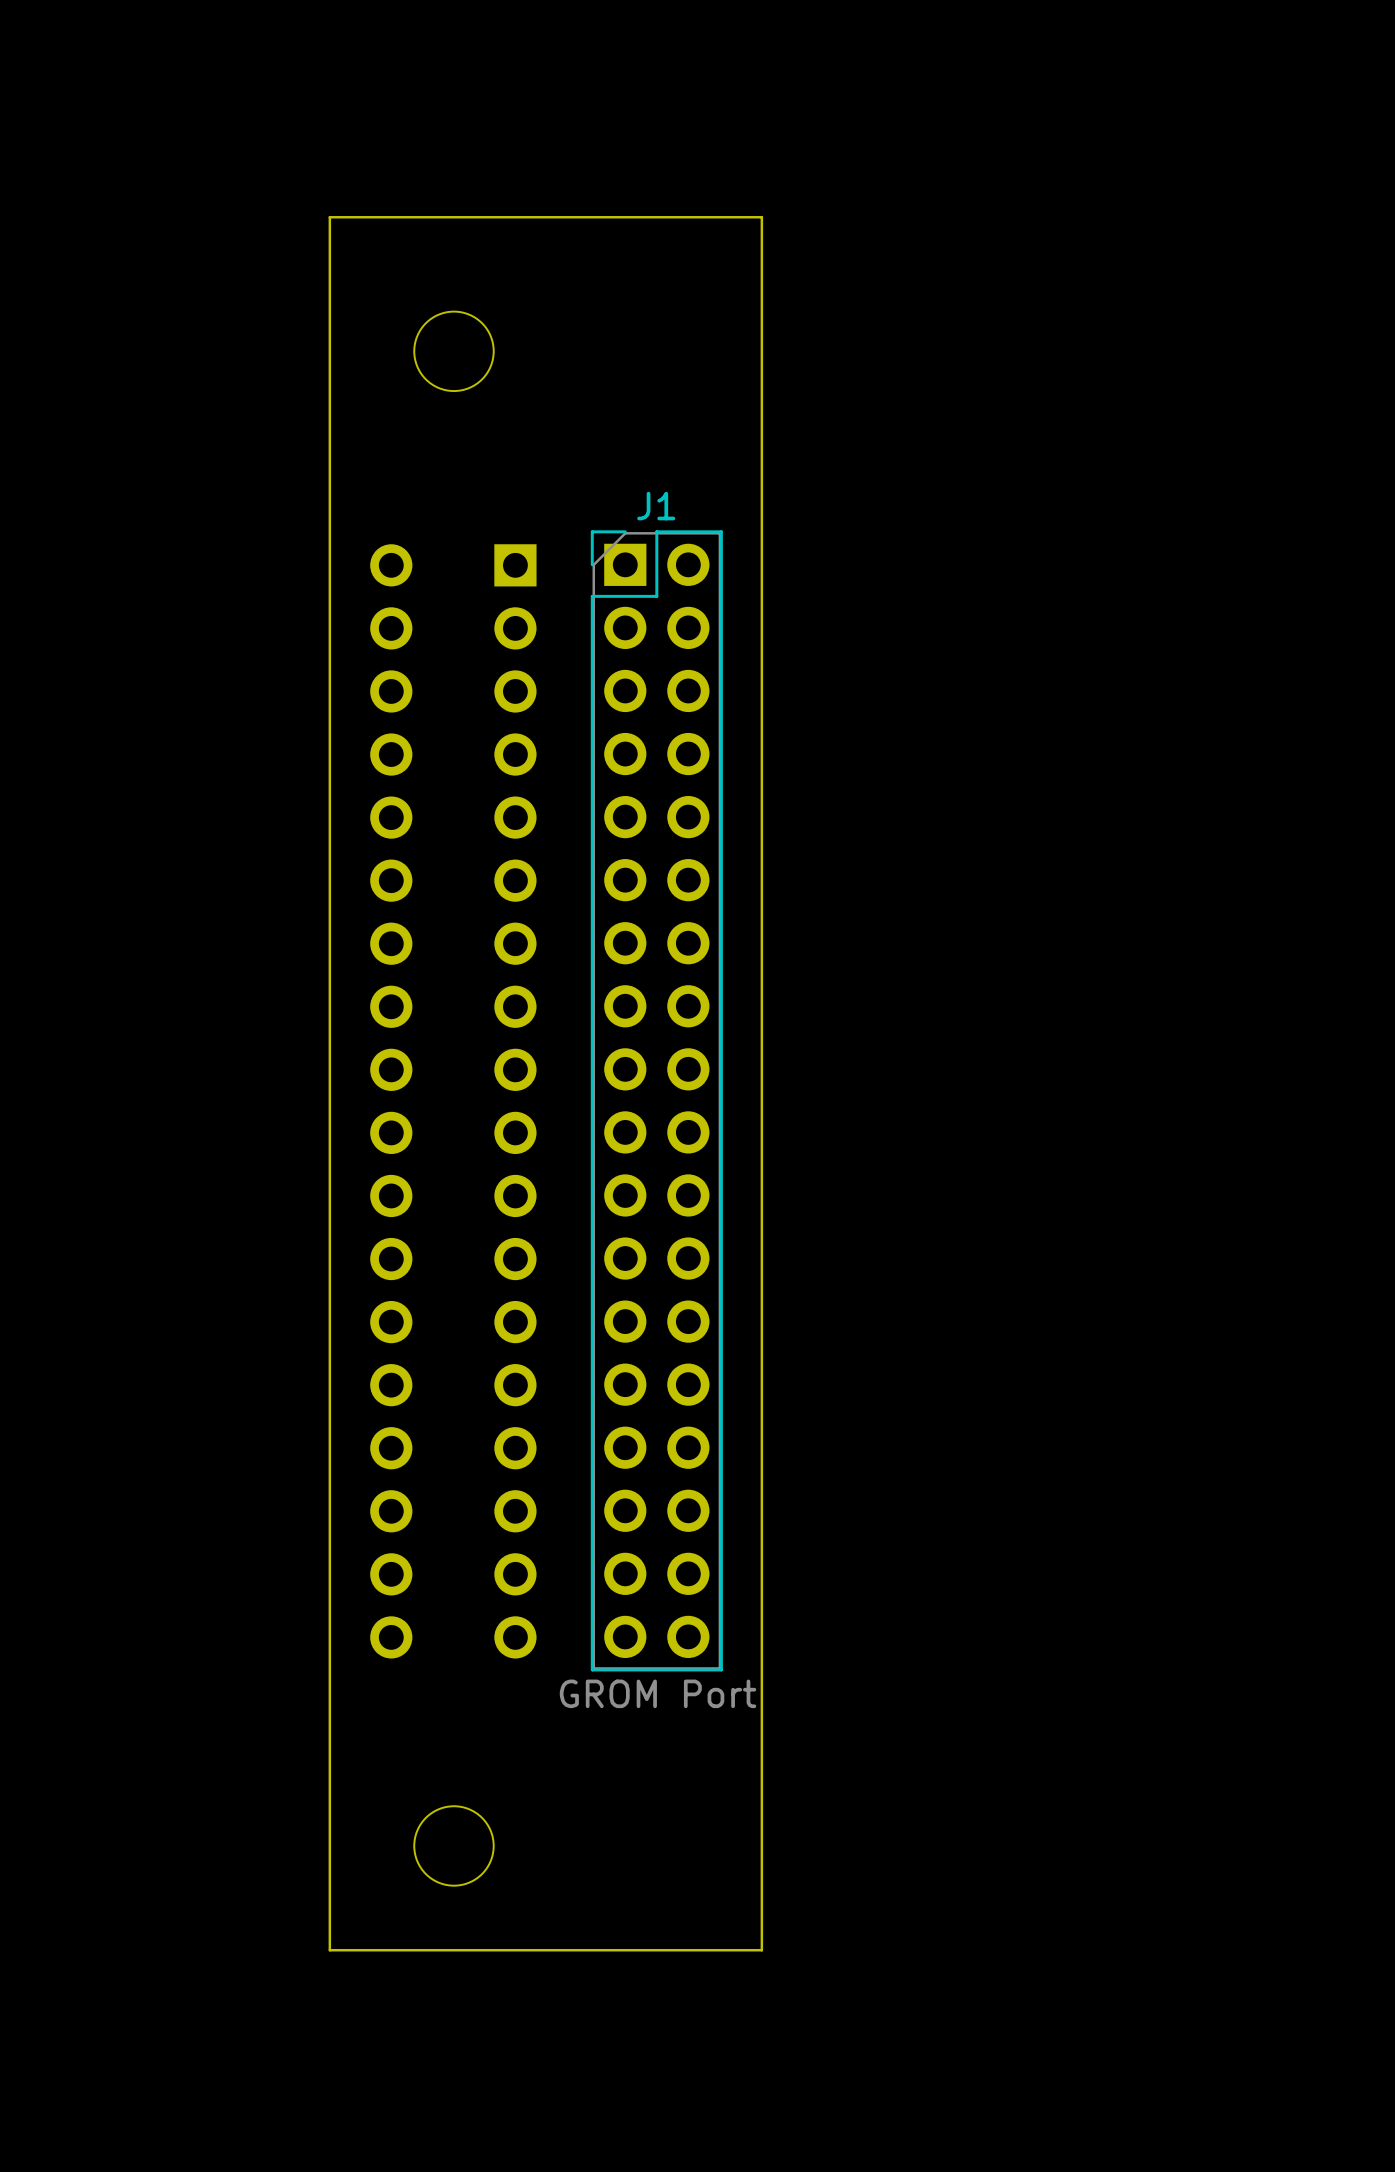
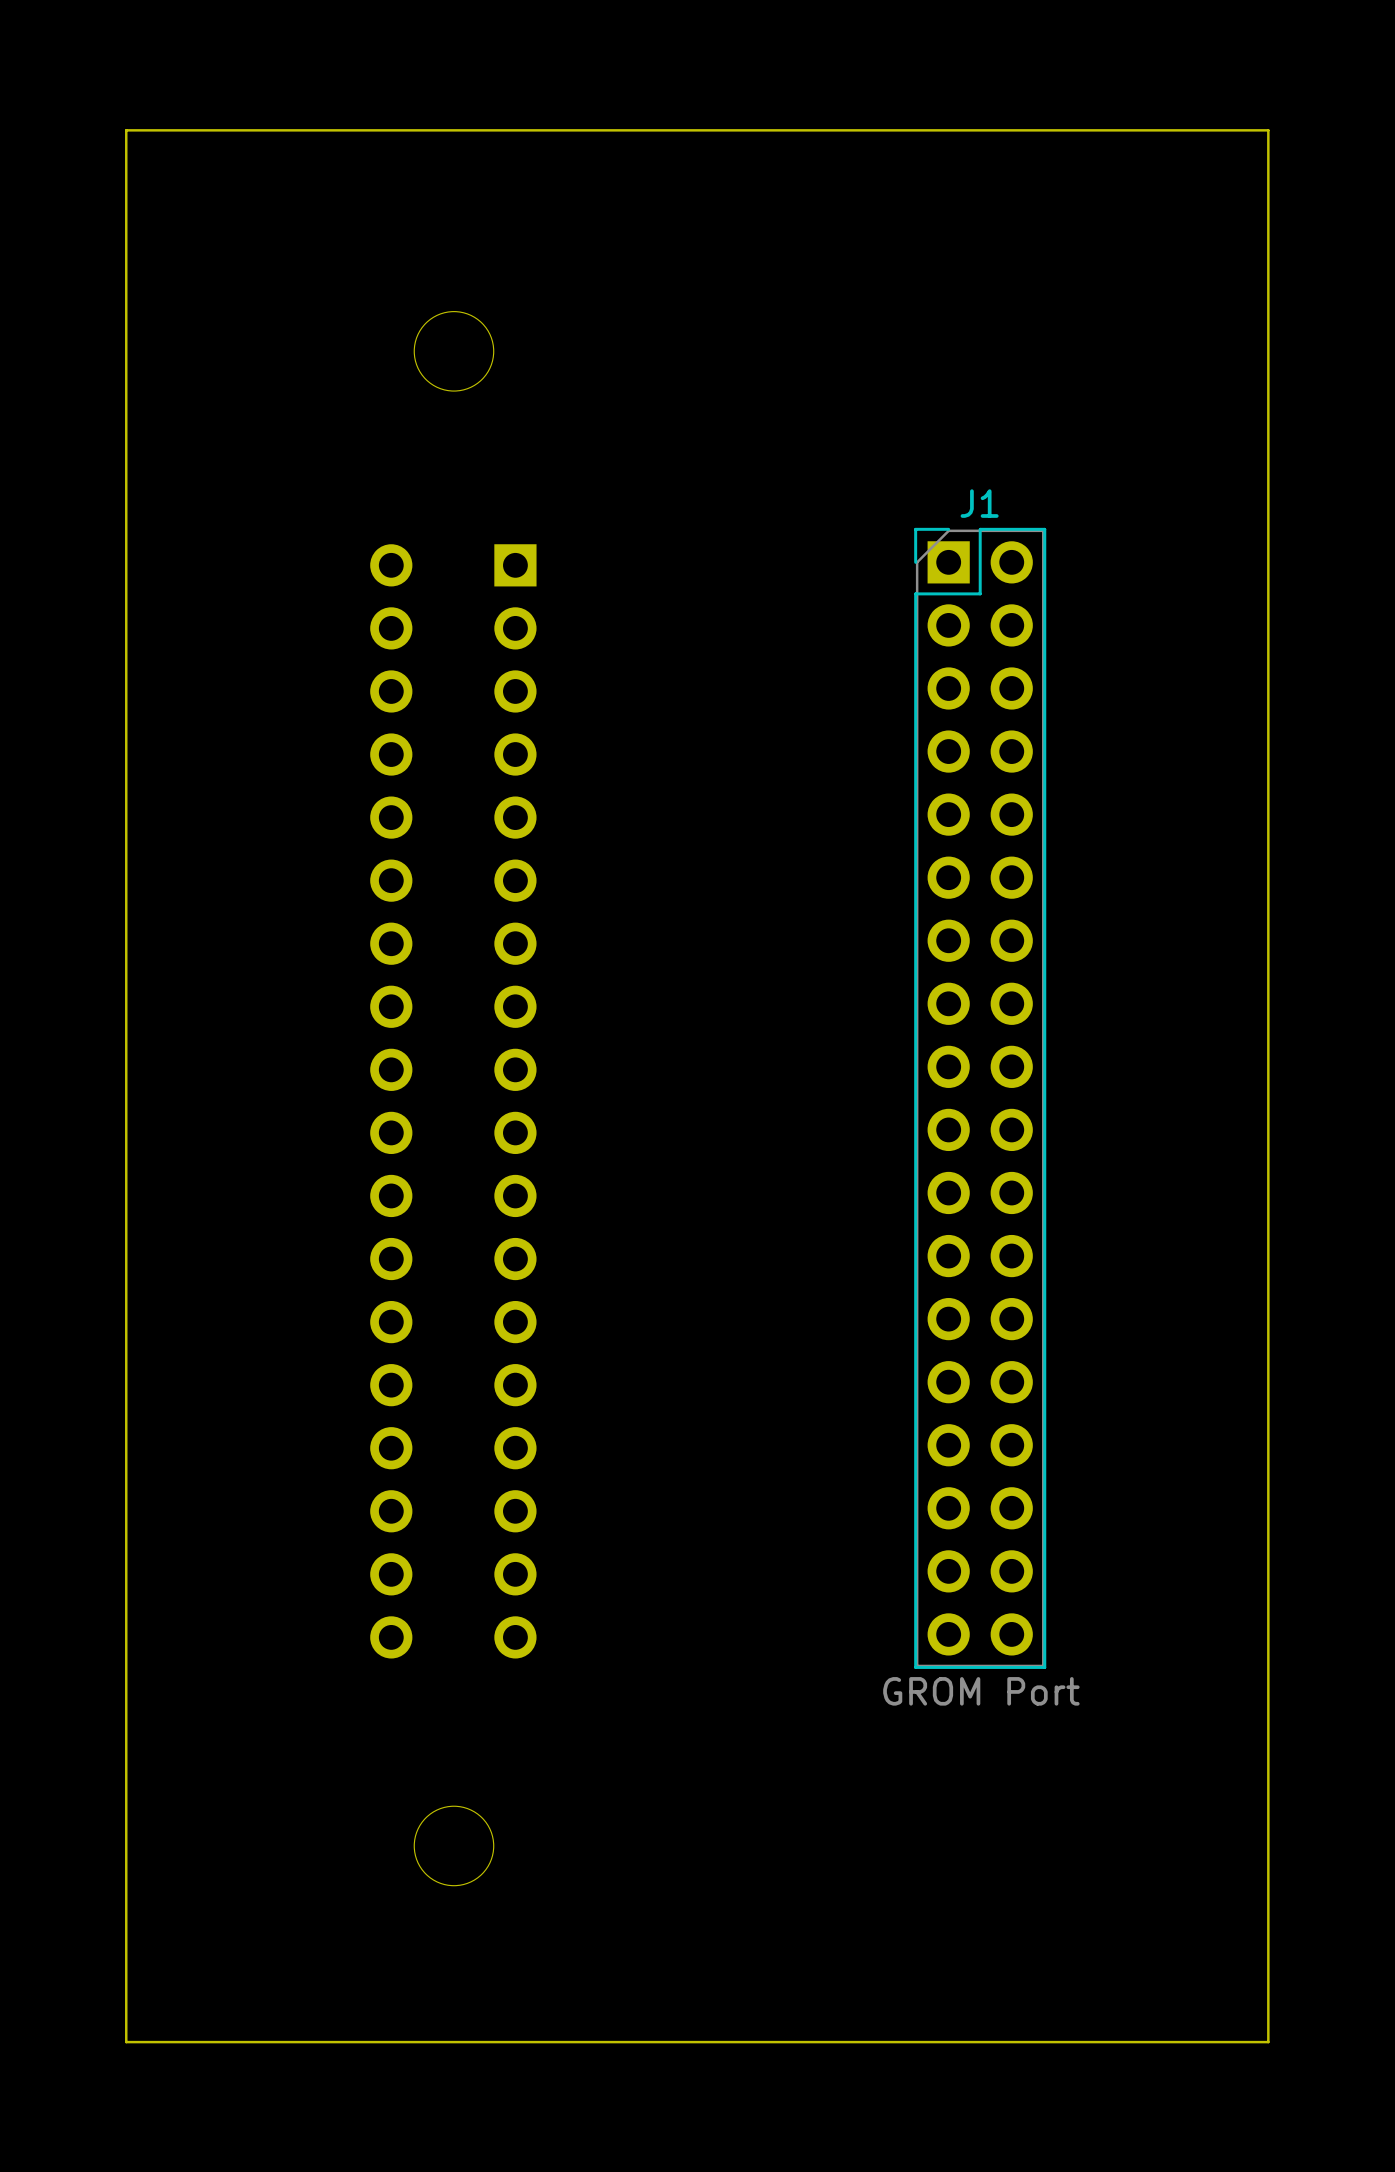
board edge: none -> (1268, 130) (126, 130) (126, 2042) (1268, 2042) (1268, 130)
board edge: (761, 217) (329, 217) (329, 1950) (761, 1950) (761, 217) -> none
J1 position: (656, 1100) -> (980, 1098)

